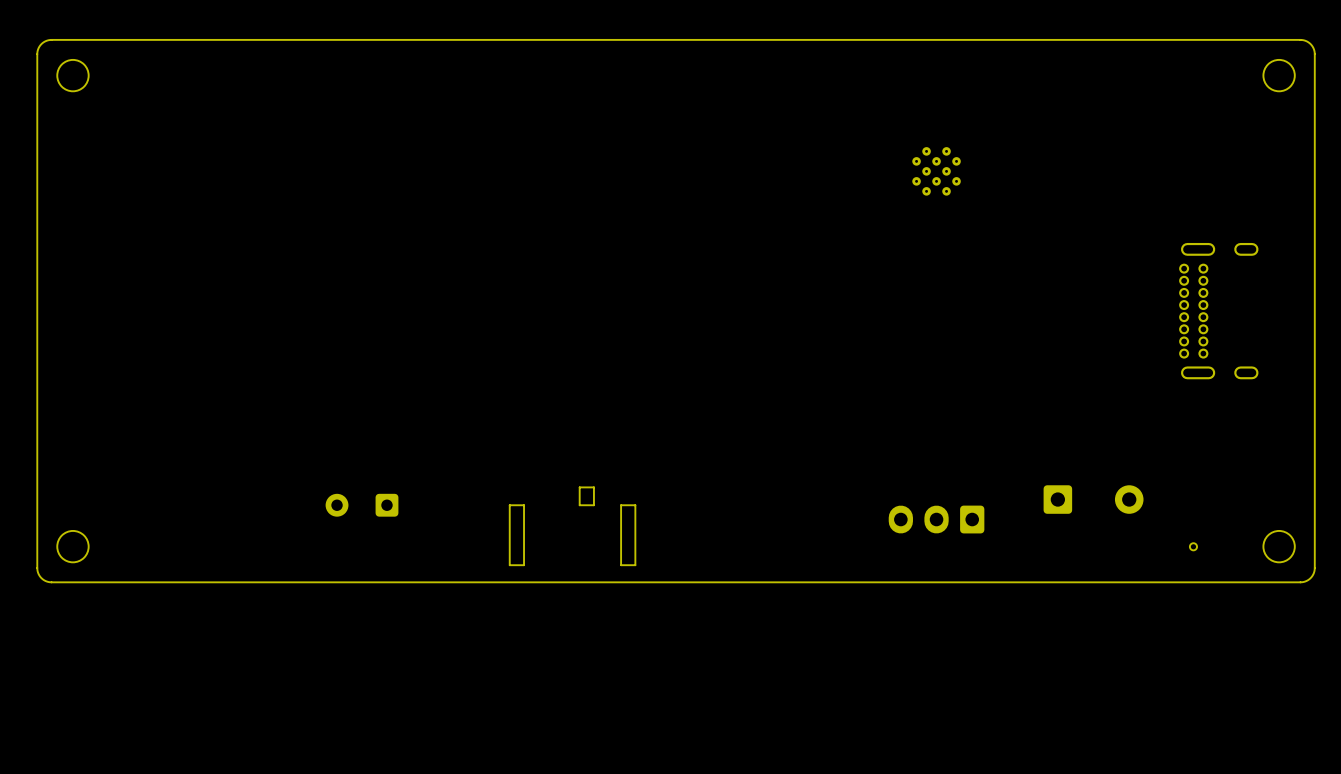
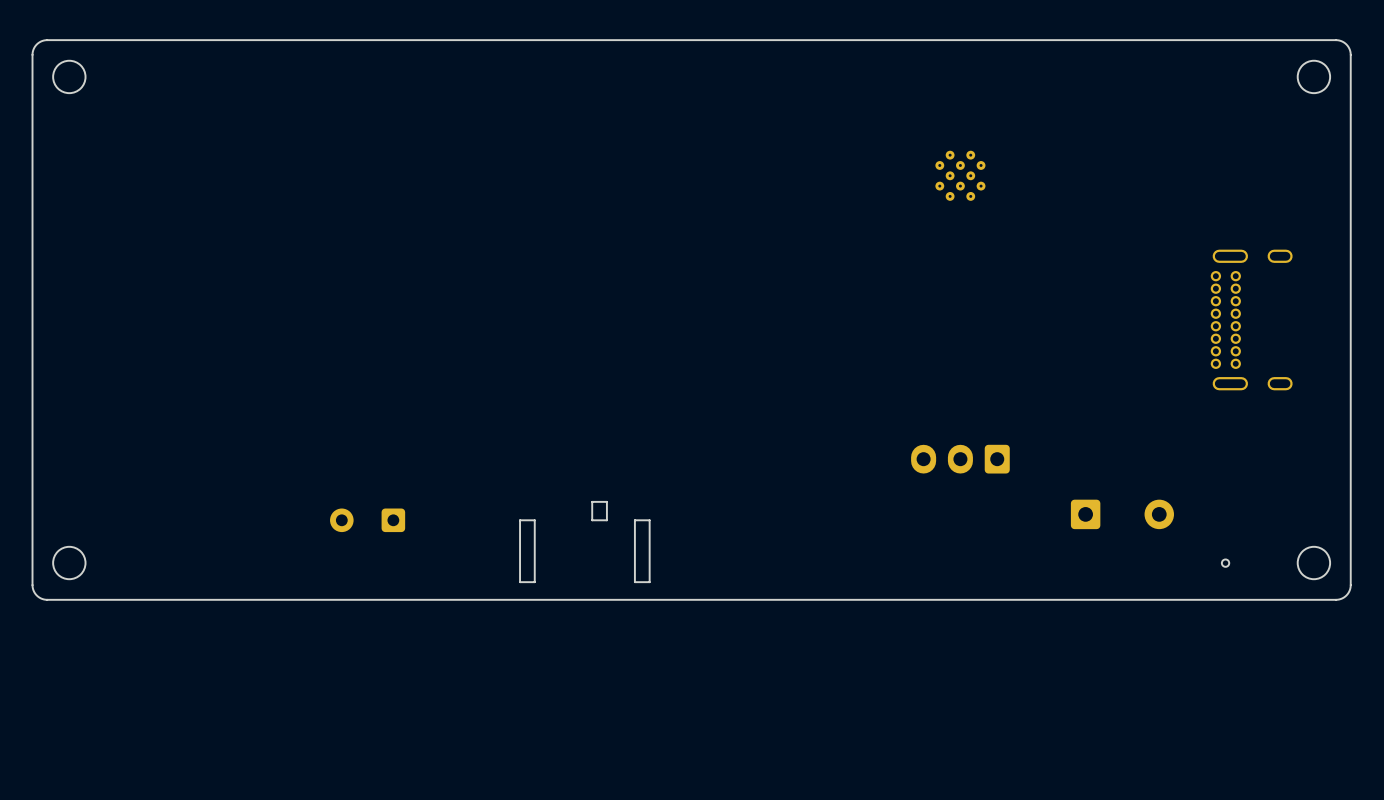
part position: (936, 519) -> (960, 459)

